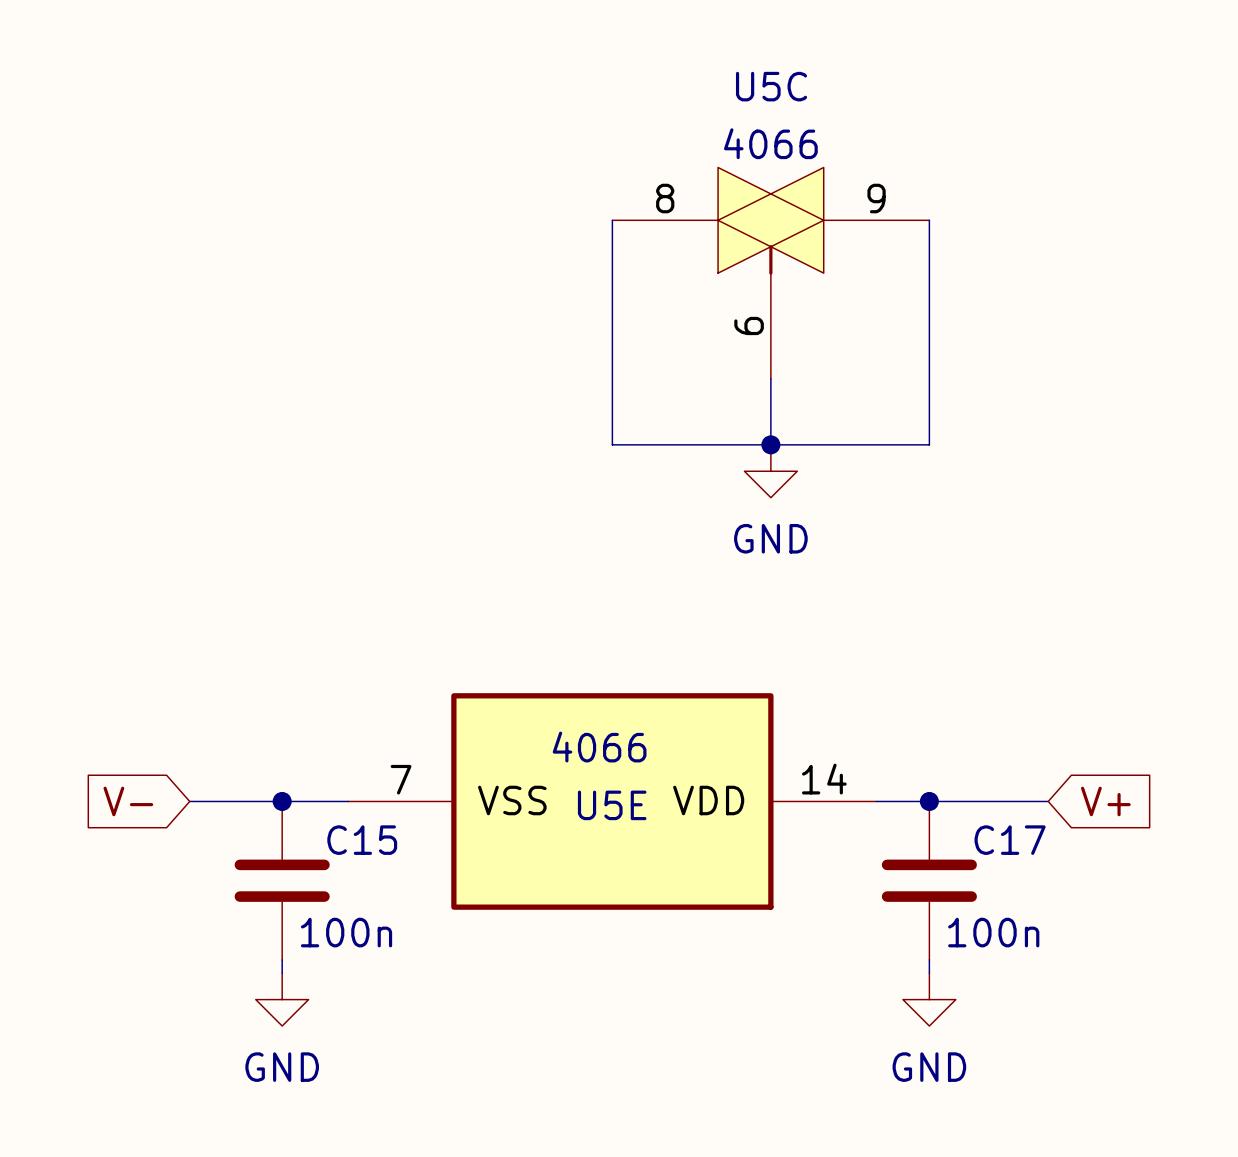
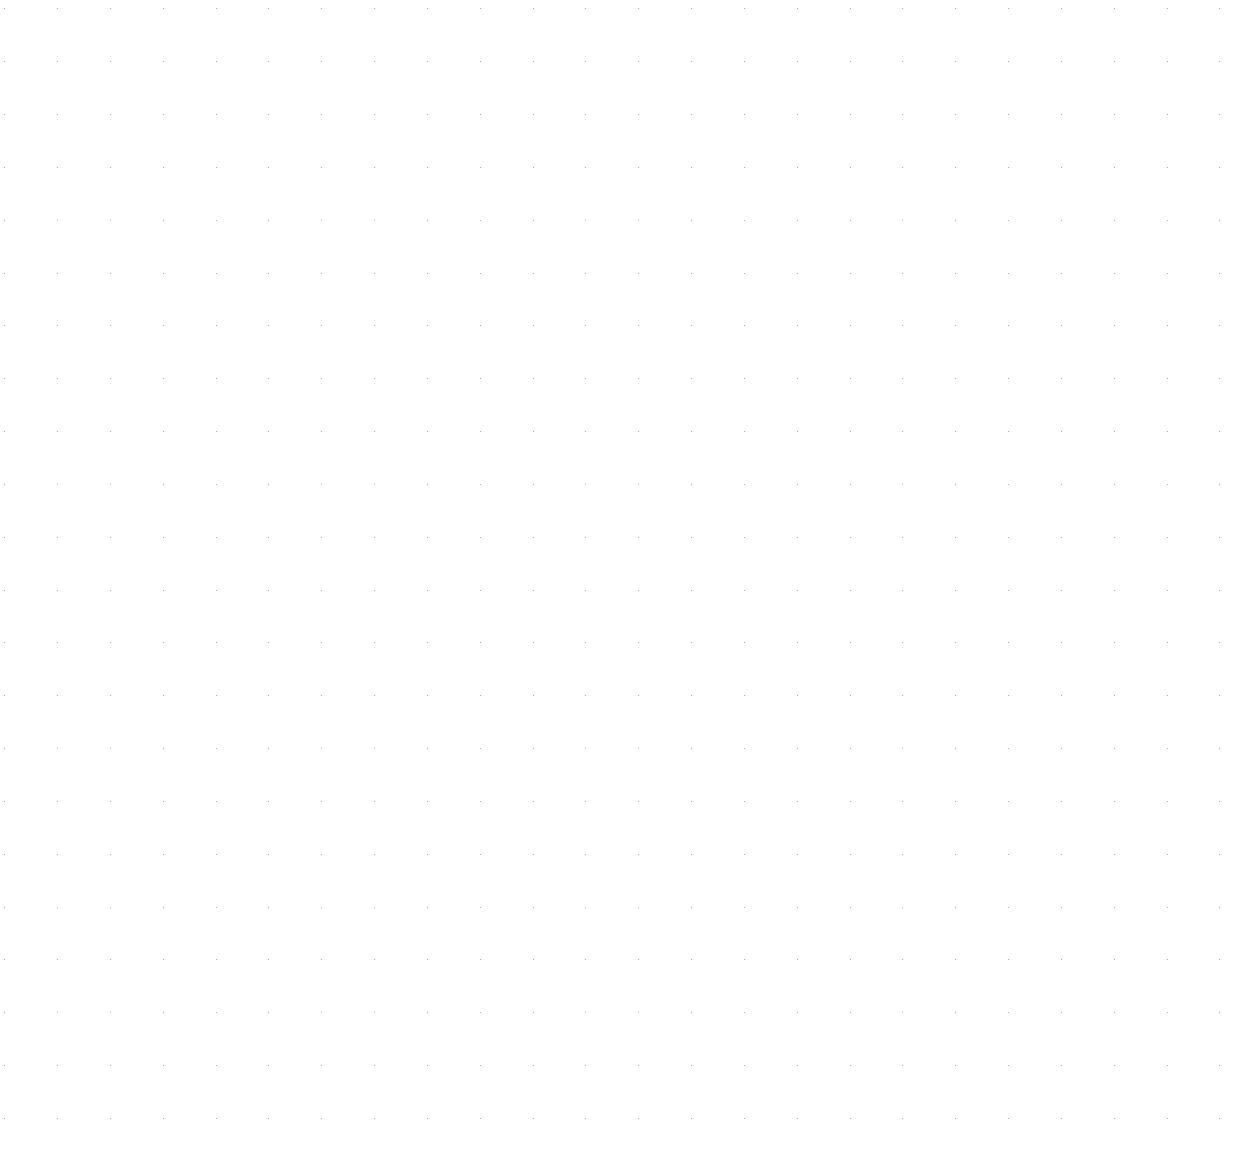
wire: (612, 220) (612, 444) (929, 444) (929, 220) -> none
U5C: 4066 (770, 273) -> none
wire: (770, 378) (770, 444) -> none
junction: (770, 444) -> none
power symbol: GND (770, 471) -> none
global label: V- (128, 801) -> none
wire: (189, 801) (348, 801) -> none
junction: (282, 801) -> none
U5E: 4066 (612, 801) -> none
wire: (876, 801) (1048, 801) -> none
junction: (929, 801) -> none
global label: V+ (1105, 801) -> none
C15: 100n (282, 880) -> none
C17: 100n (929, 880) -> none
wire: (282, 959) (282, 973) -> none
wire: (929, 959) (929, 973) -> none
power symbol: GND (282, 999) -> none
power symbol: GND (929, 999) -> none

